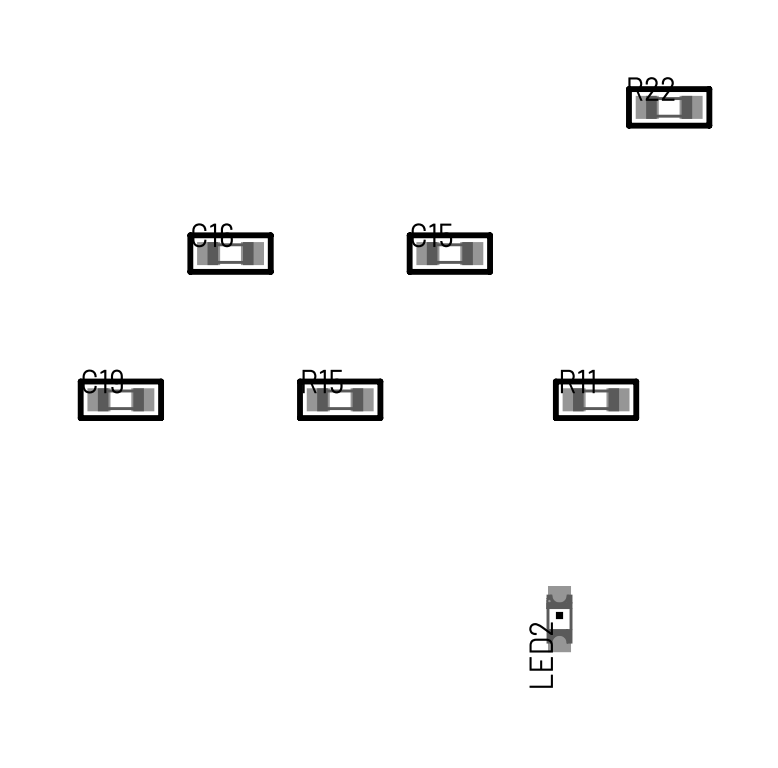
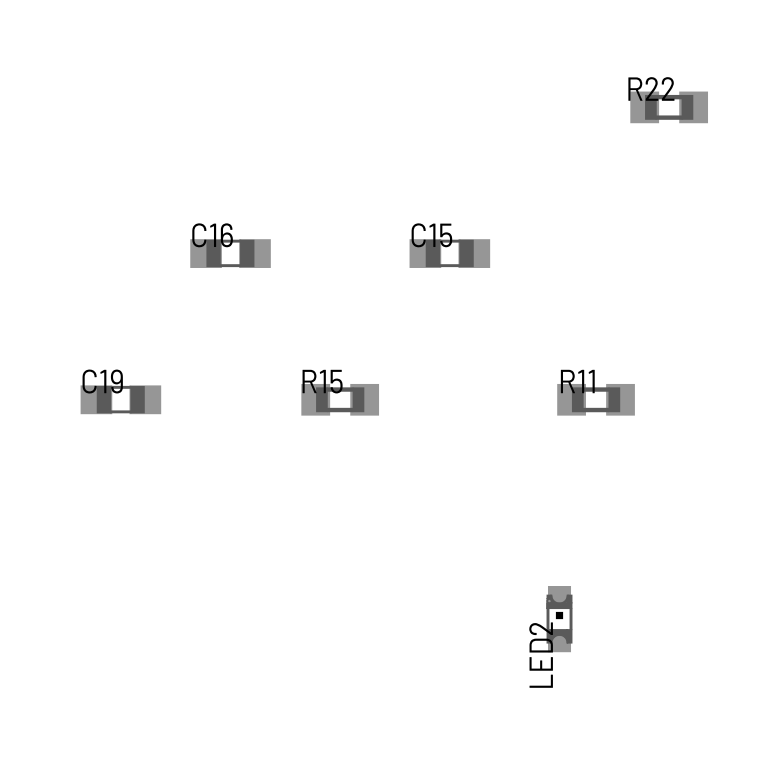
R22 footprint: [626, 86, 713, 129] -> [630, 91, 709, 124]
C16 footprint: [187, 232, 274, 275] -> [190, 239, 271, 268]
C15 footprint: [406, 232, 493, 275] -> [409, 239, 491, 268]
C19 footprint: [77, 378, 165, 421] -> [80, 385, 162, 415]
R15 footprint: [297, 378, 384, 421] -> [301, 383, 380, 416]
R11 footprint: [552, 378, 640, 421] -> [557, 383, 635, 416]

